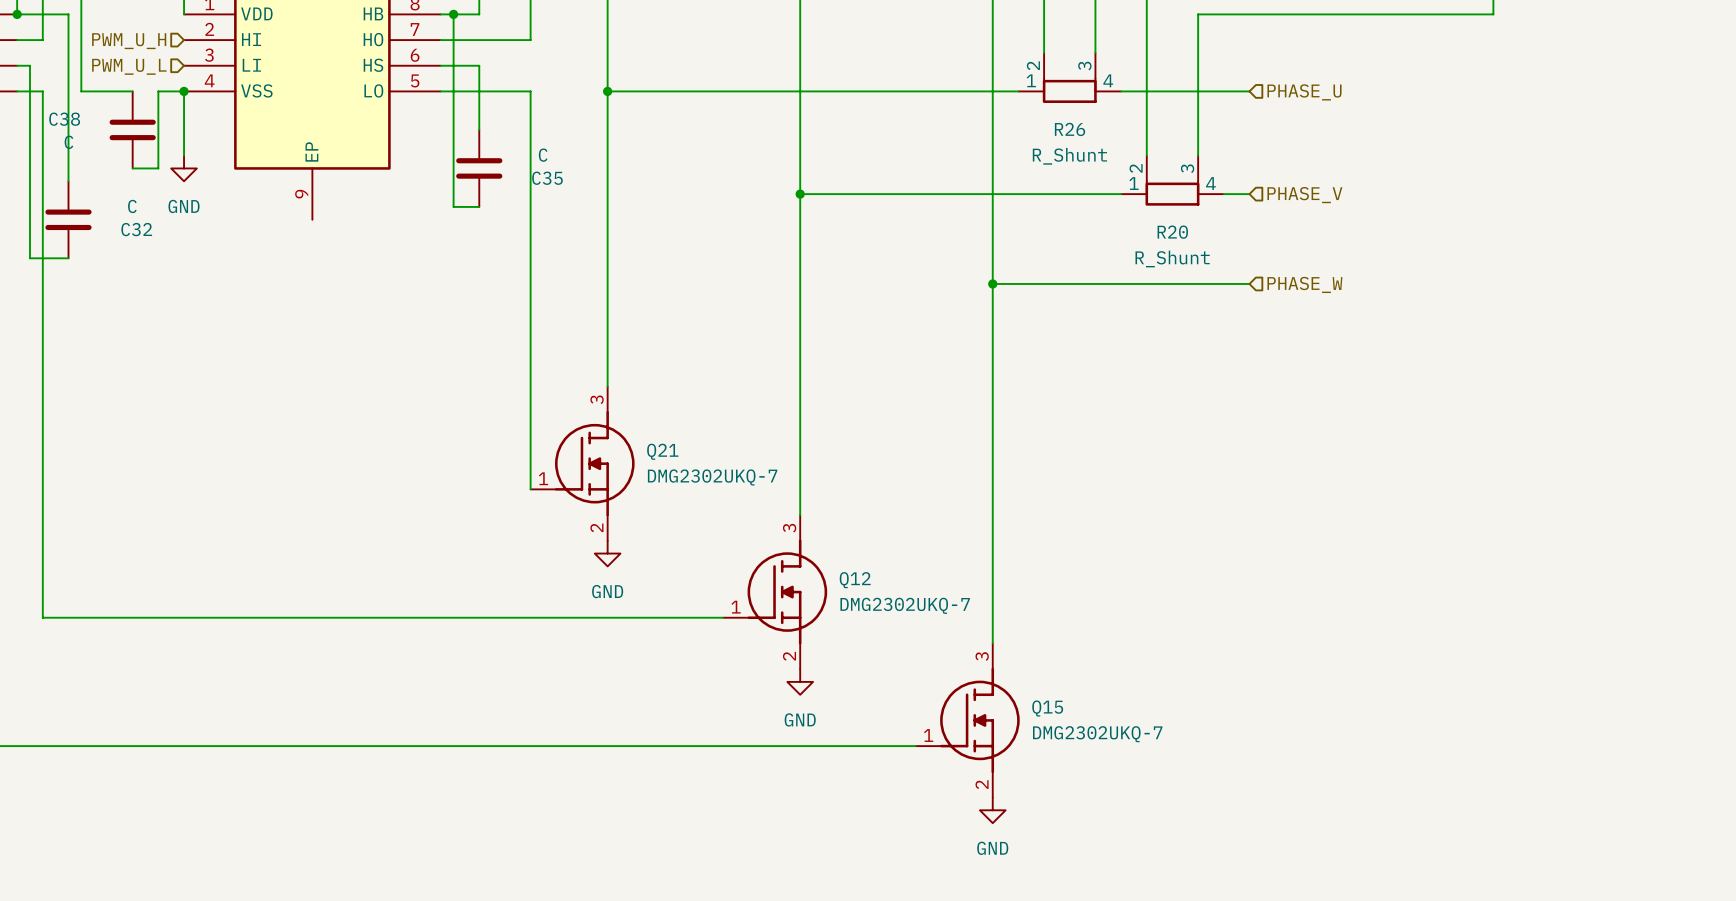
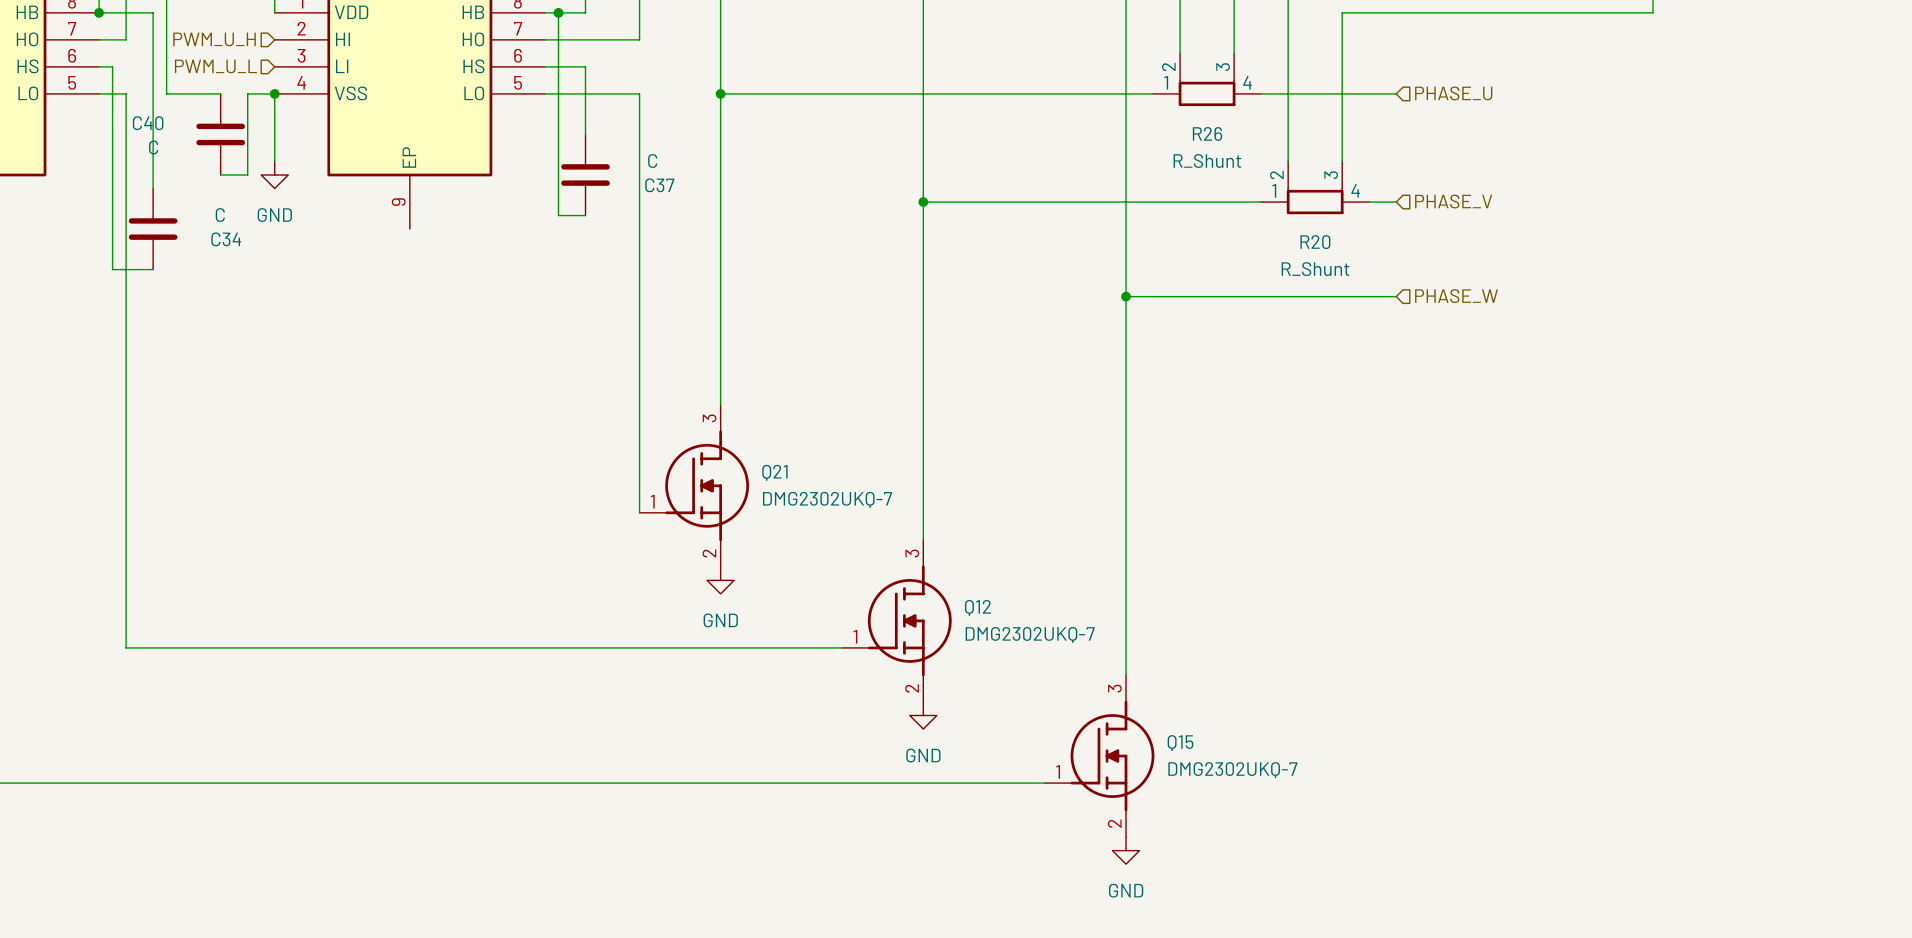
C38 name: C38 (64, 119) -> C40 (148, 123)
C35 name: C35 (547, 178) -> C37 (659, 185)
C32 name: C32 (136, 229) -> C34 (226, 239)

